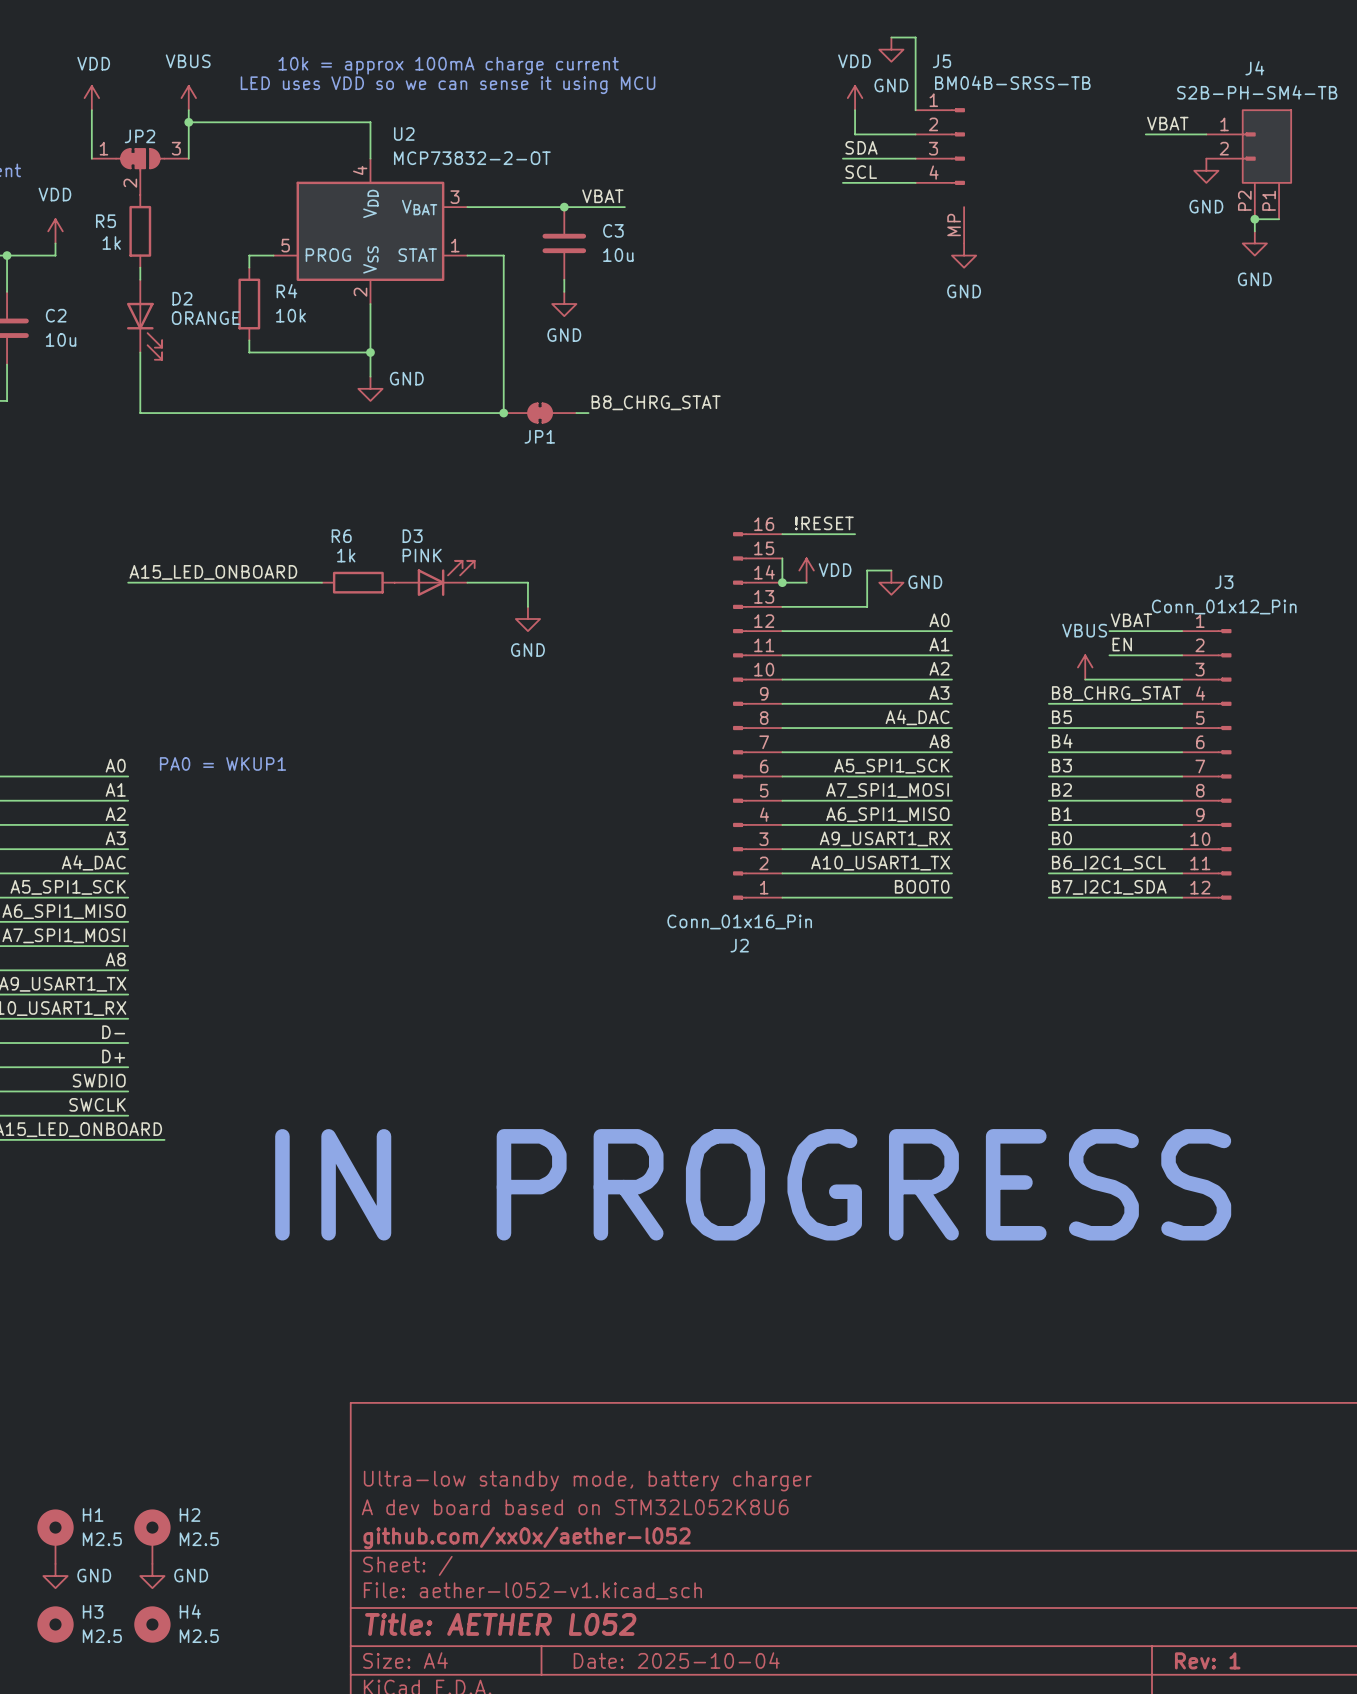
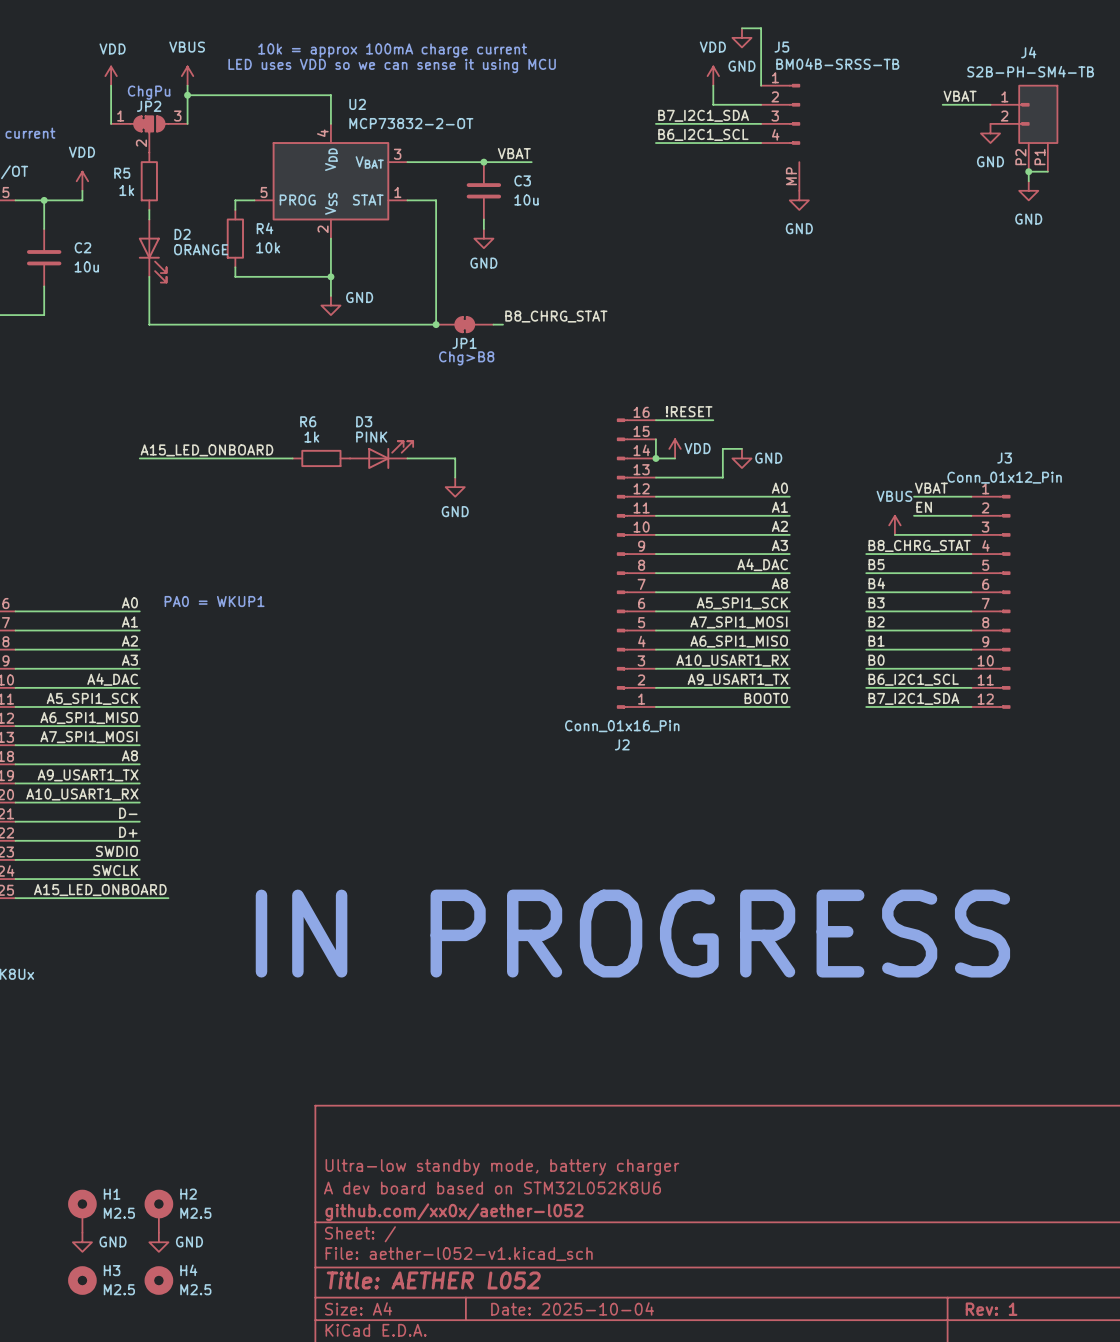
text: none -> ChgPu (149, 92)
label: SDA (861, 147) -> none
label: none -> B7_I2C1_SDA (703, 115)
wire: none -> (655, 123) (703, 123)
label: none -> B6_I2C1_SCL (703, 134)
label: SCL (861, 172) -> none
wire: none -> (655, 143) (703, 143)
text: none -> Chg>B8 (466, 358)
label: A9_USART1_RX (884, 838) -> A10_USART1_RX (732, 660)
label: A10_USART1_TX (880, 863) -> A9_USART1_TX (738, 679)

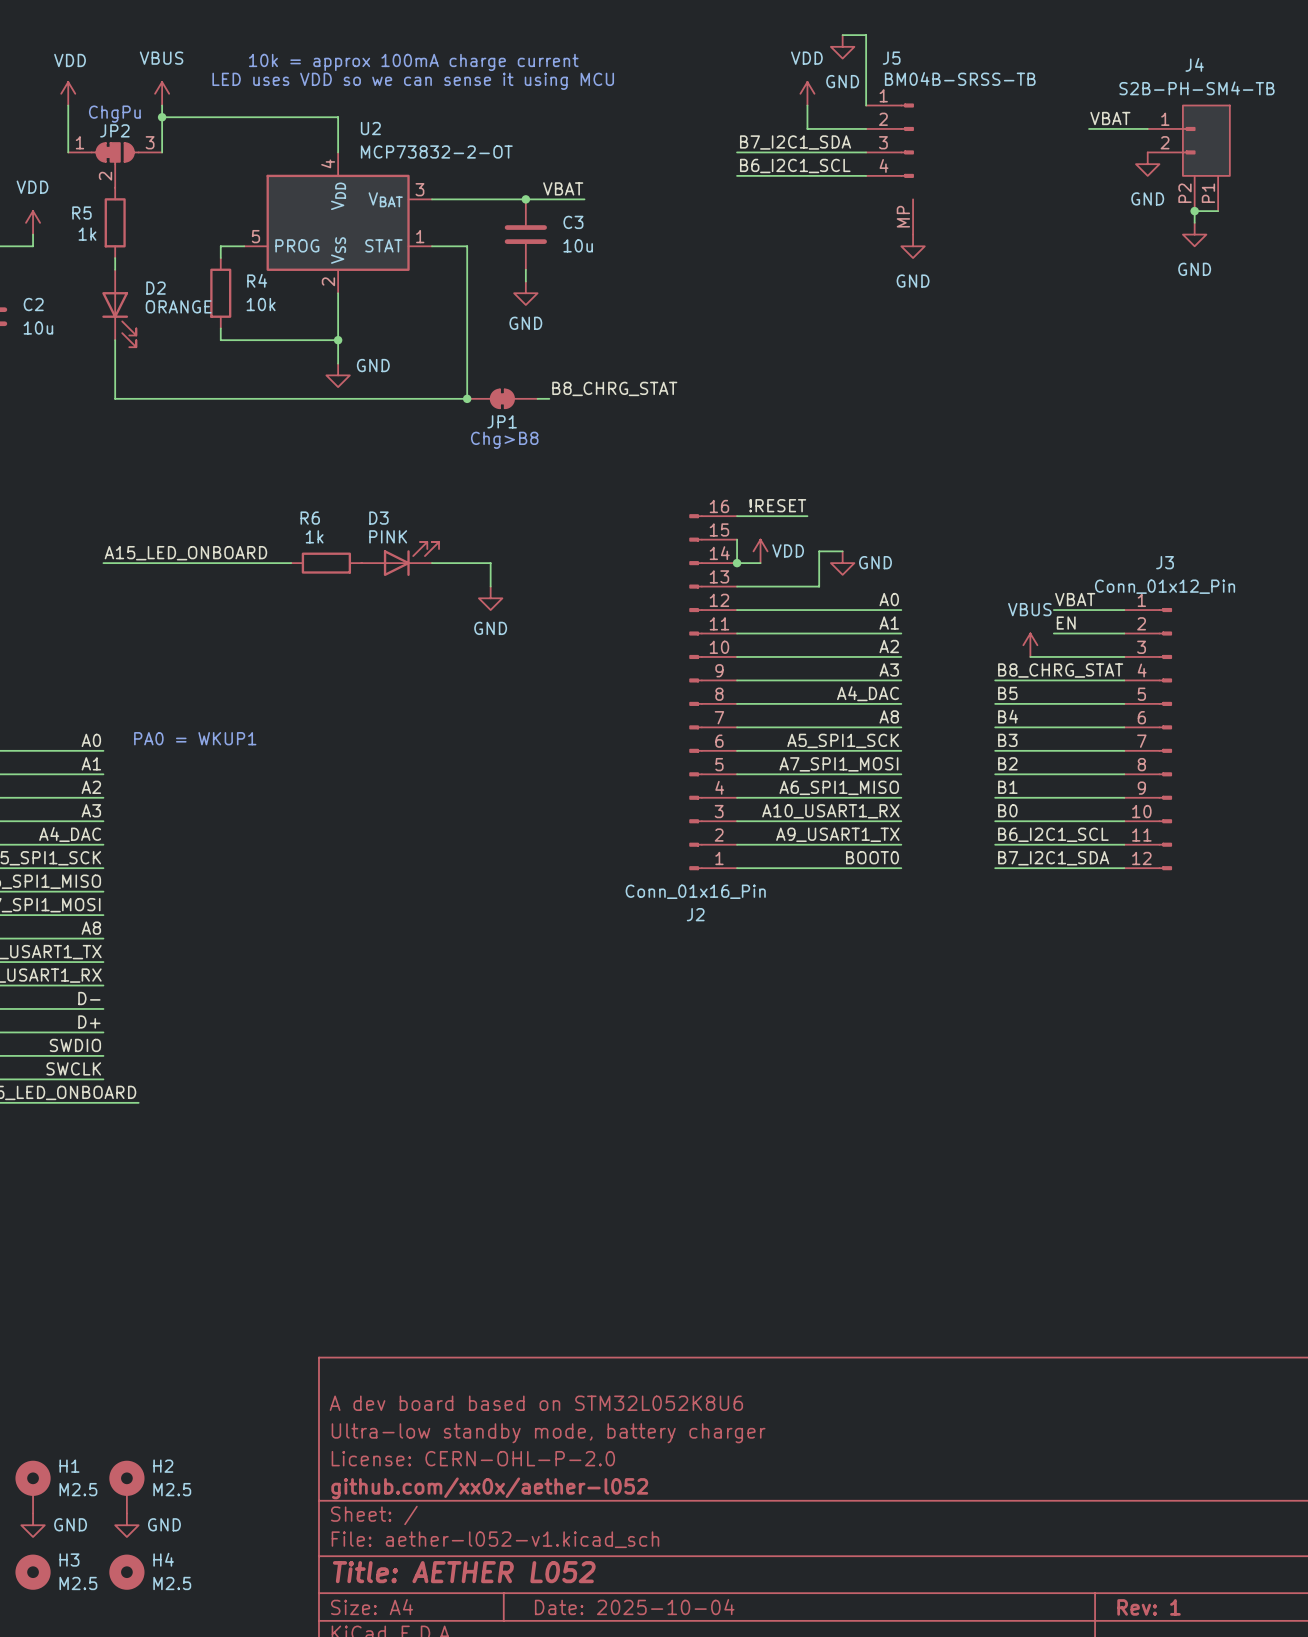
text: IN PROGRESS (632, 933) -> none
title block: none -> A dev board based on STM32L052K8U6 (536, 1403)
title block: A dev board based on STM32L052K8U6 (492, 1188) -> License: CERN-OHL-P-2.0 (473, 1458)

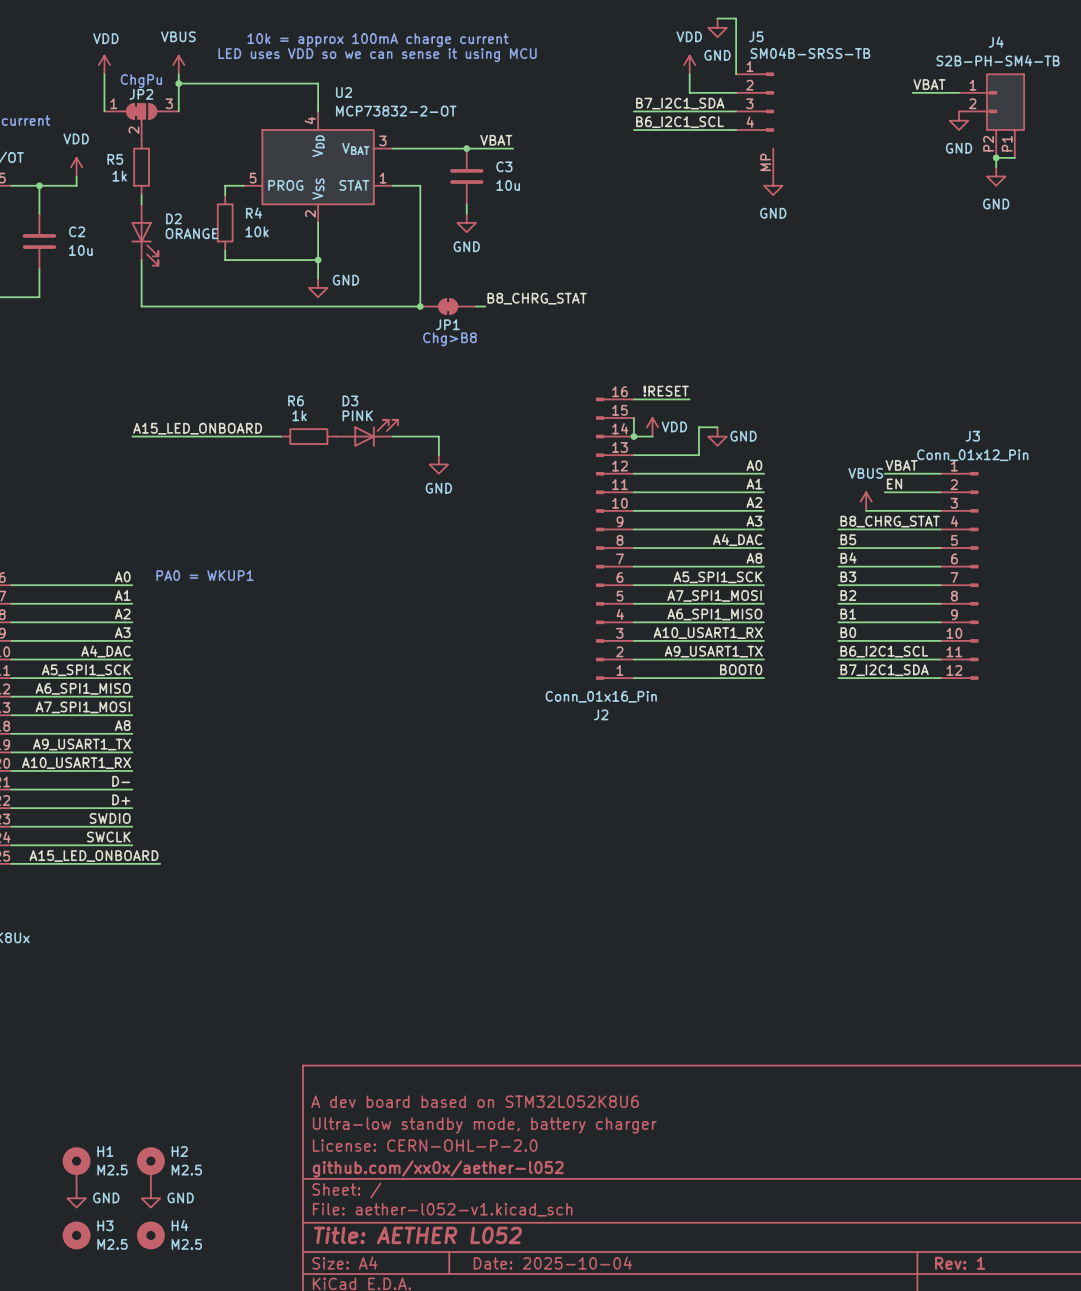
J5 value: BM04B-SRSS-TB (960, 78) -> SM04B-SRSS-TB (810, 53)

